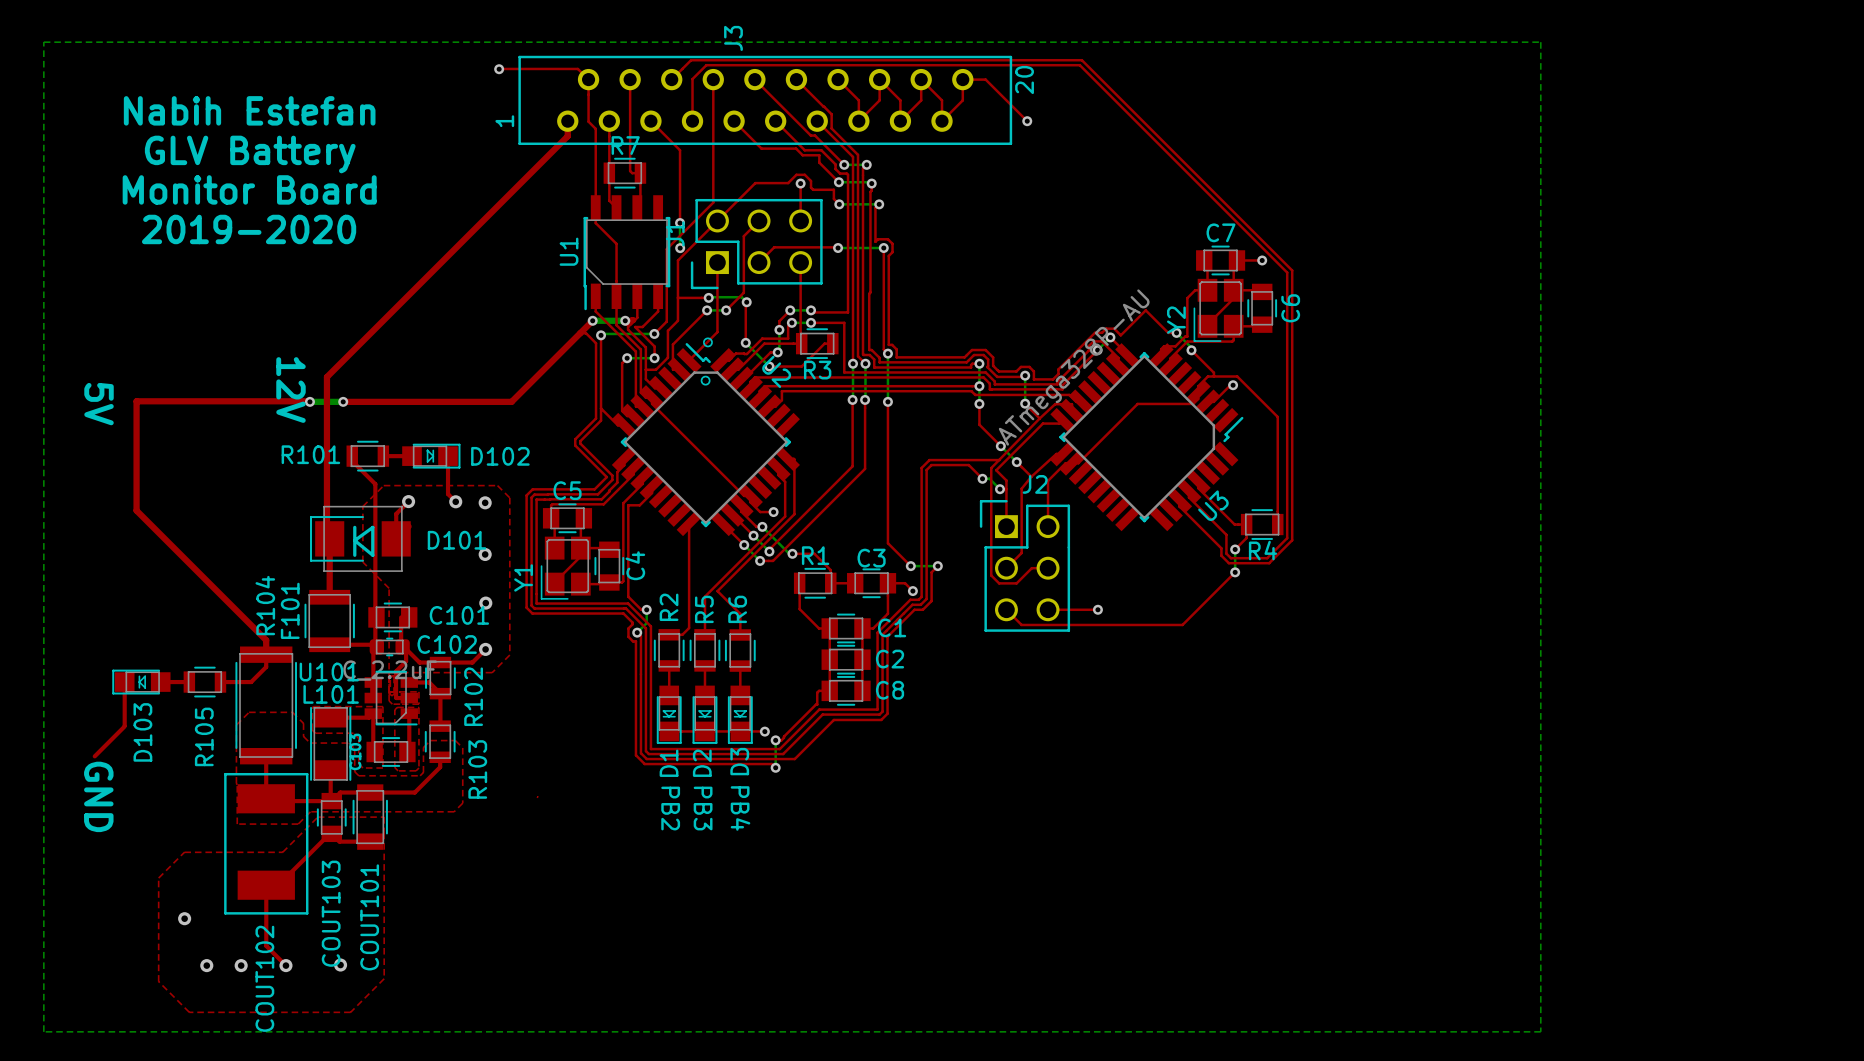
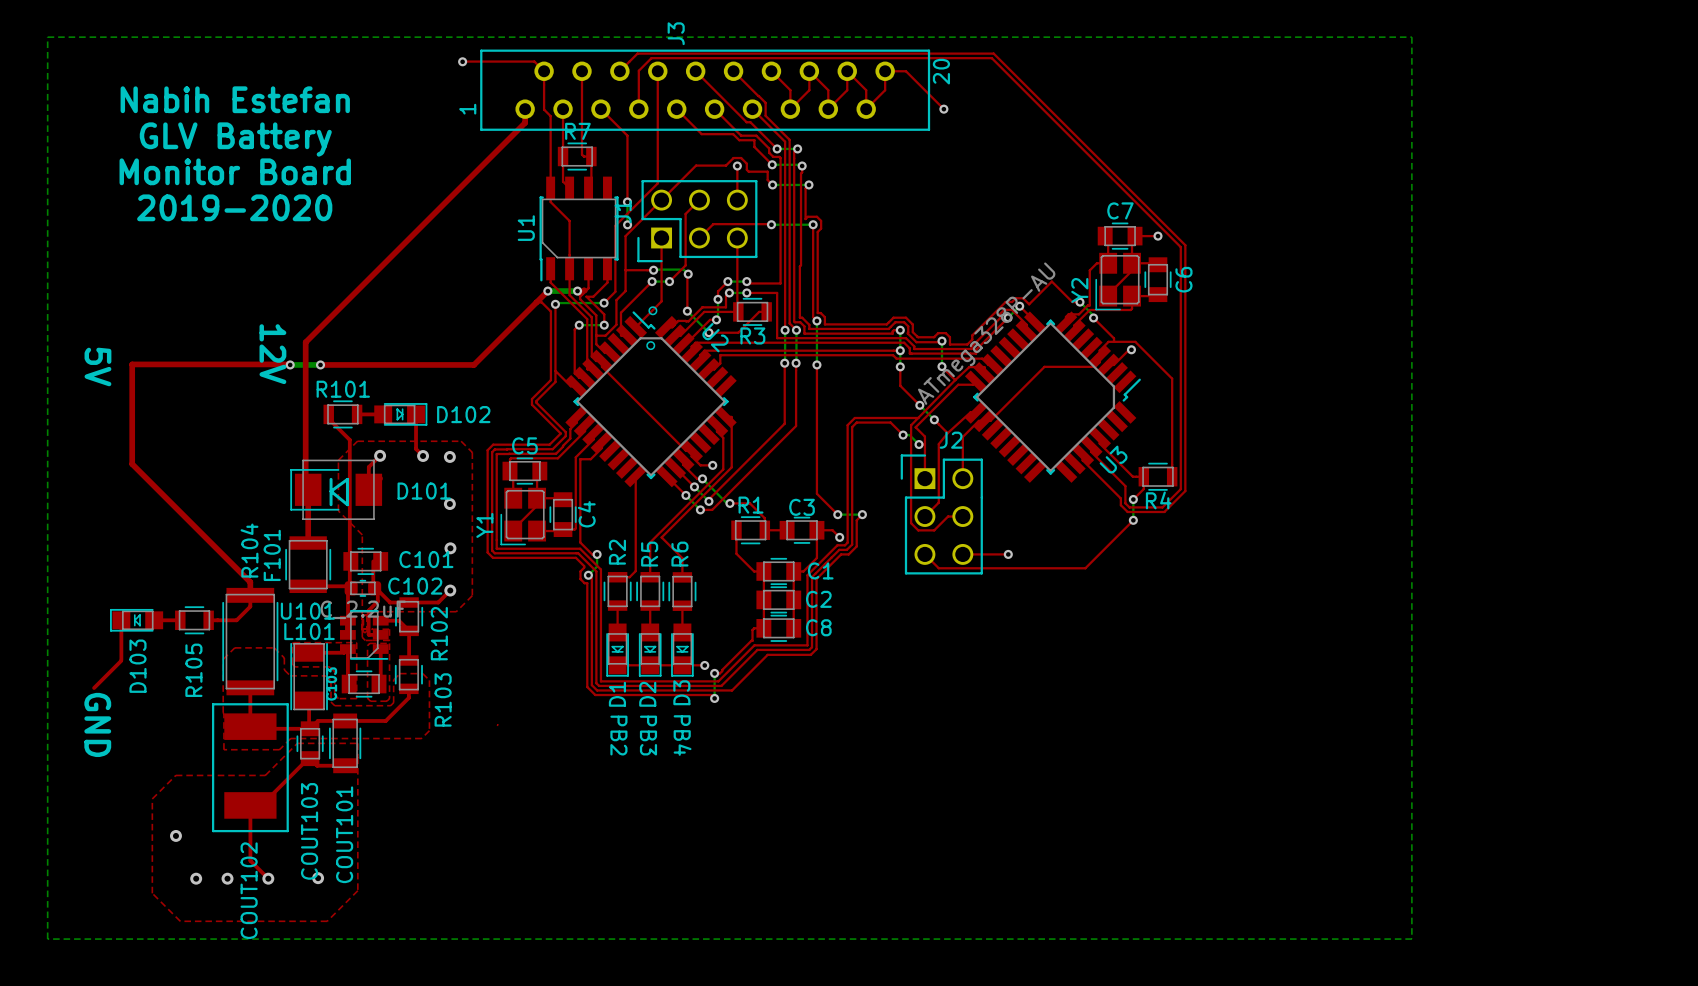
R101 name position: R101 (310, 454) -> R101 (343, 389)

